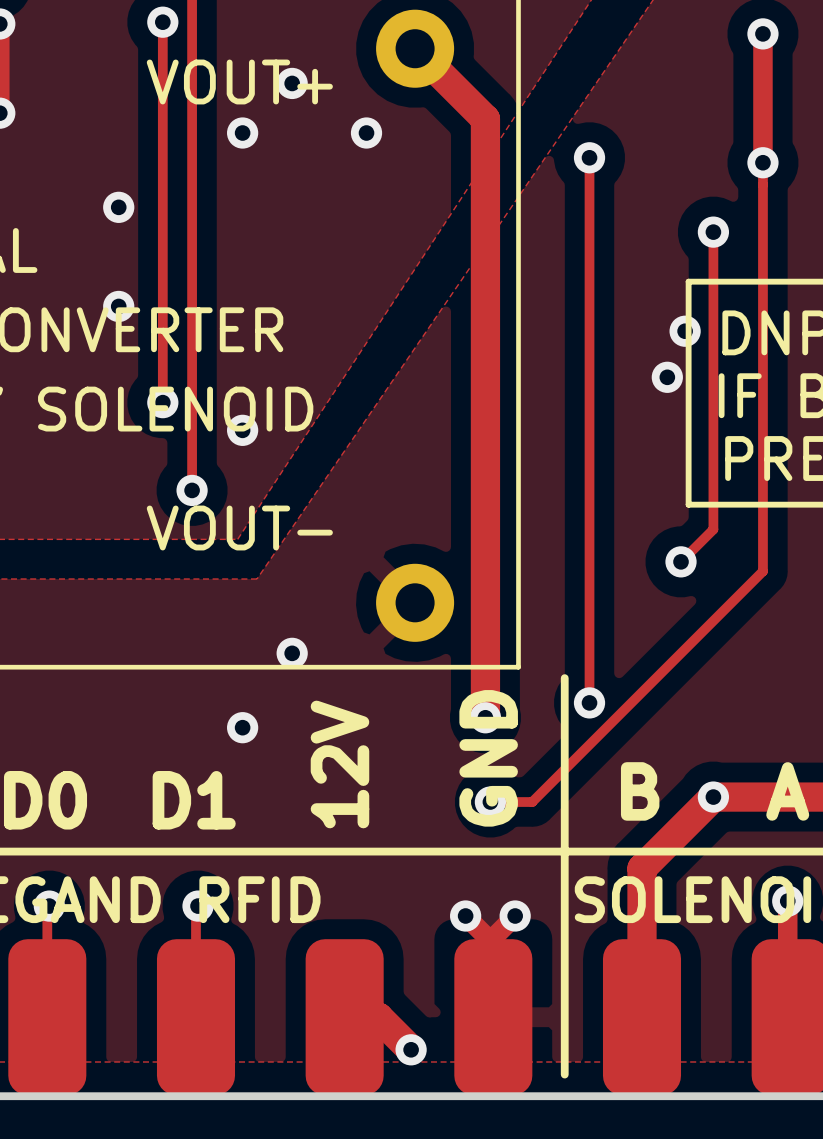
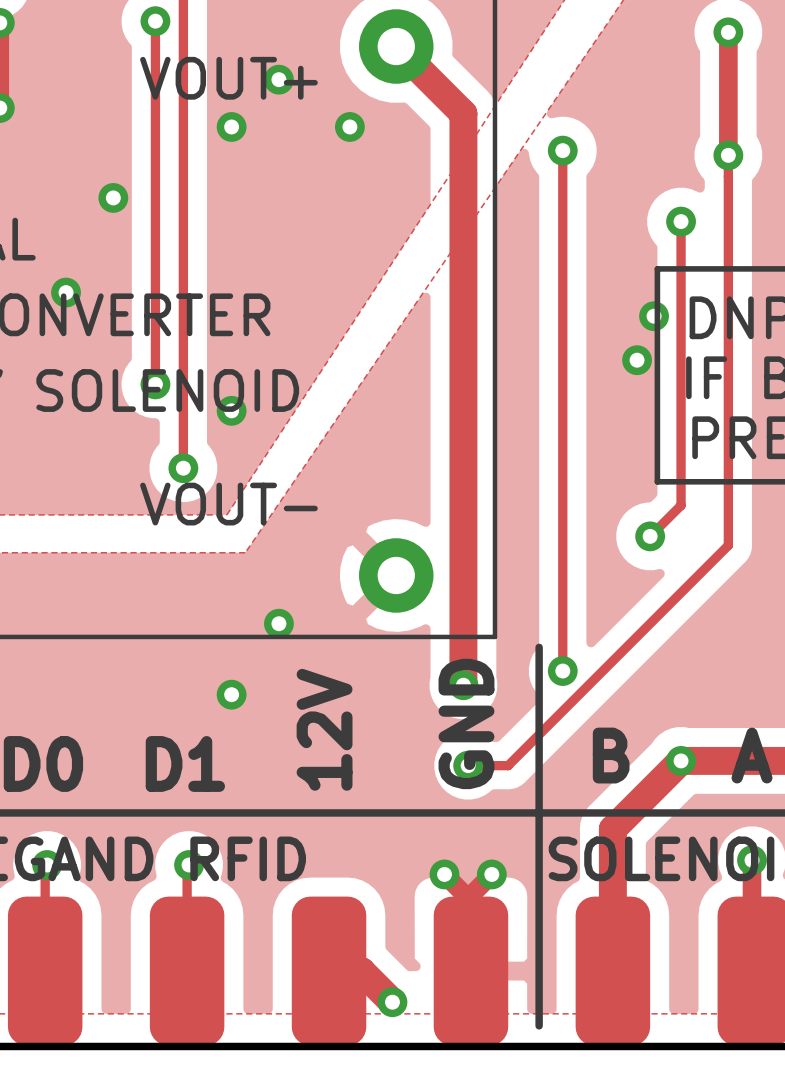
via position: (118, 306) -> (66, 292)

